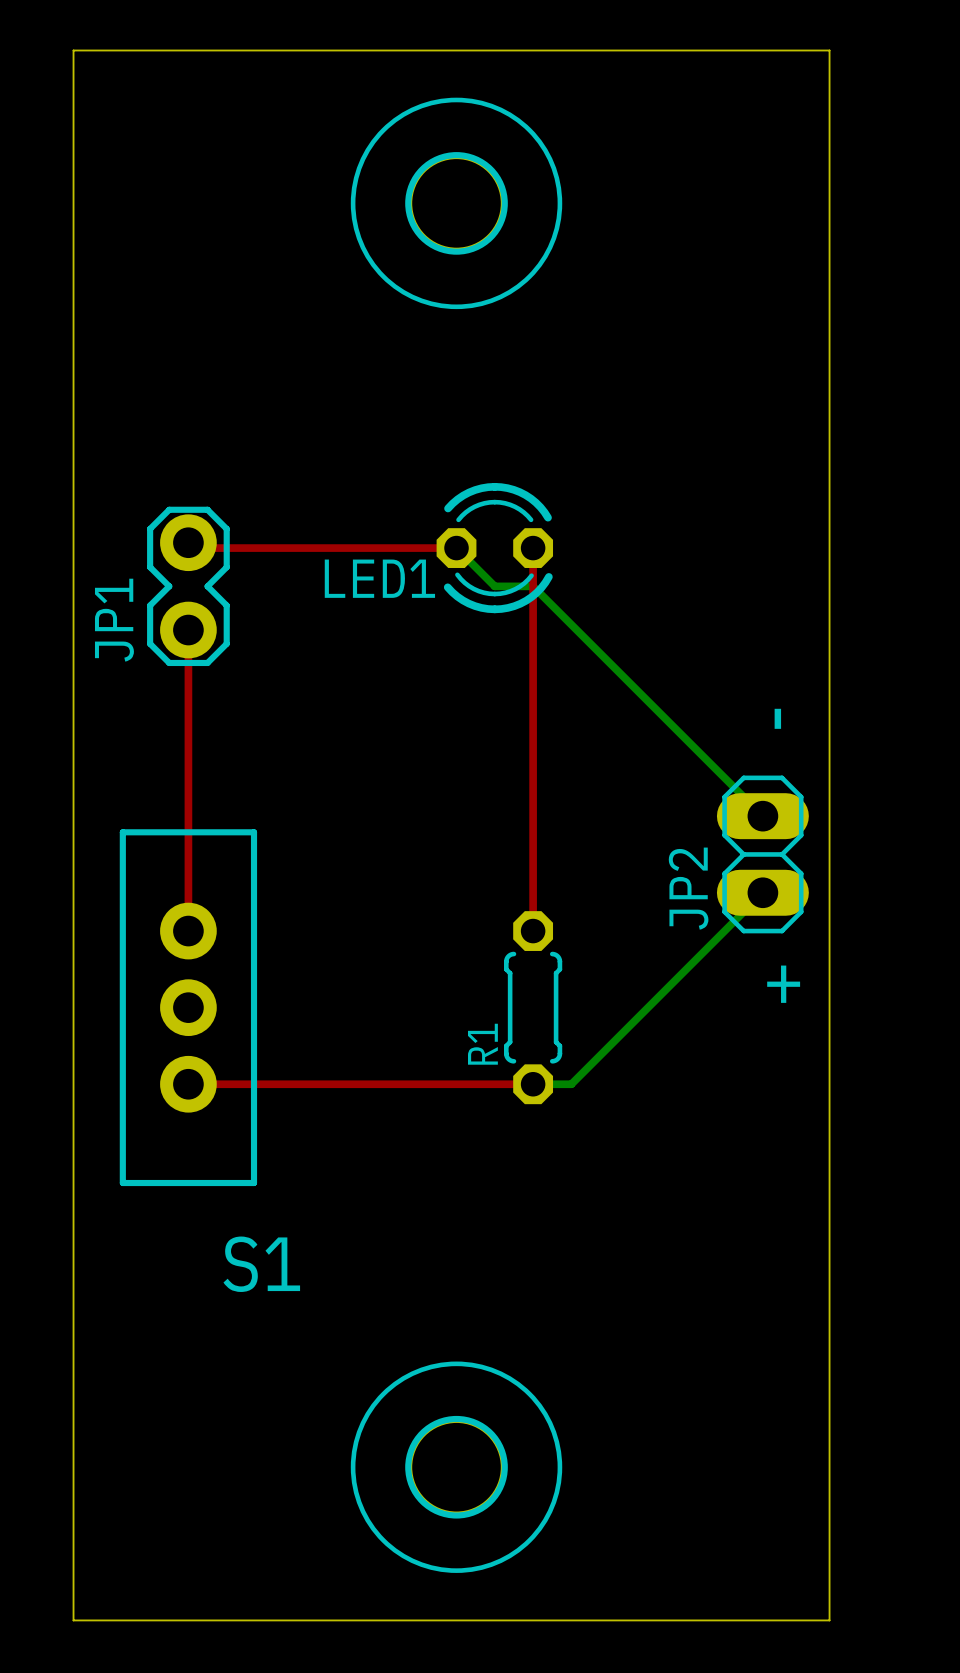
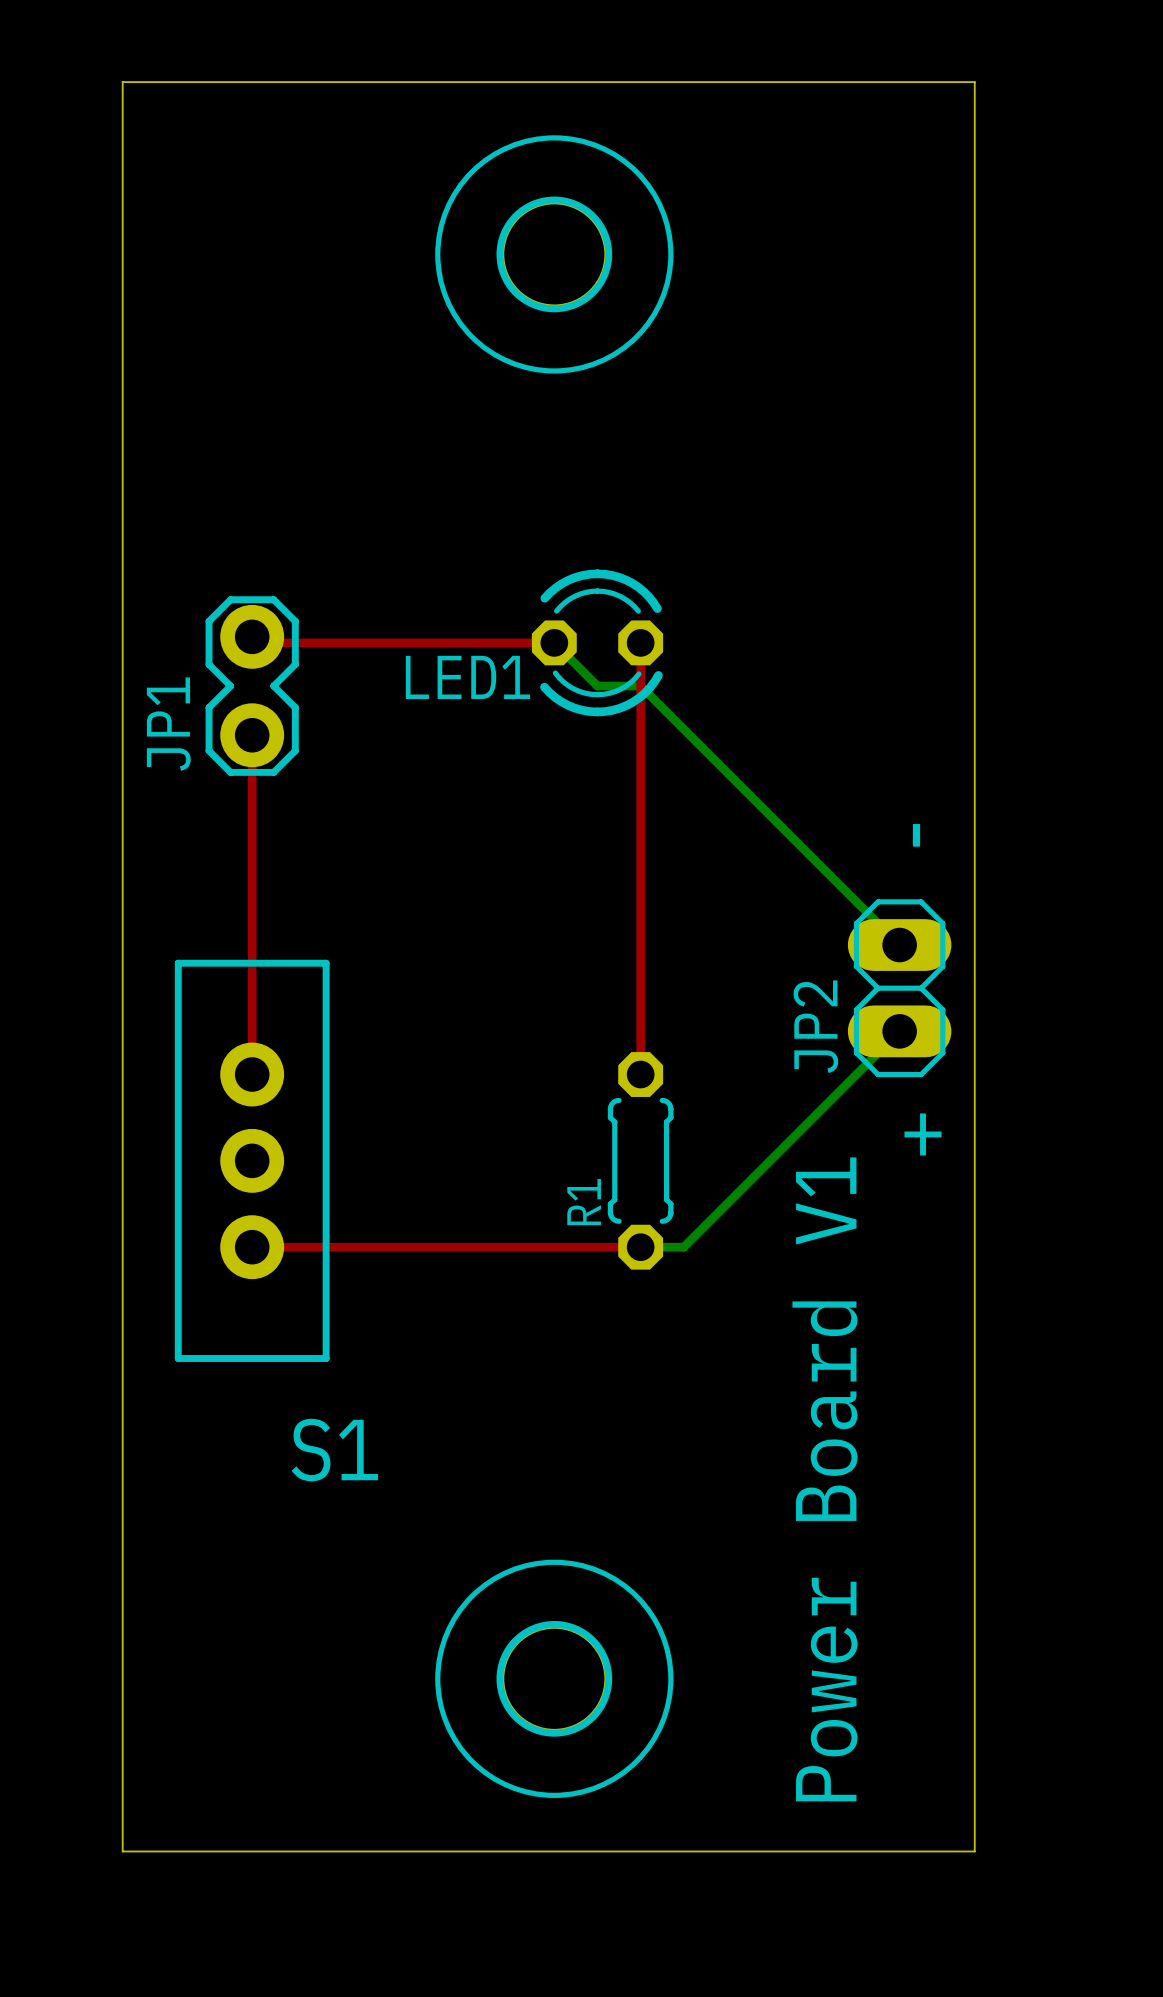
text: none -> Power Board V1 (824, 1479)

